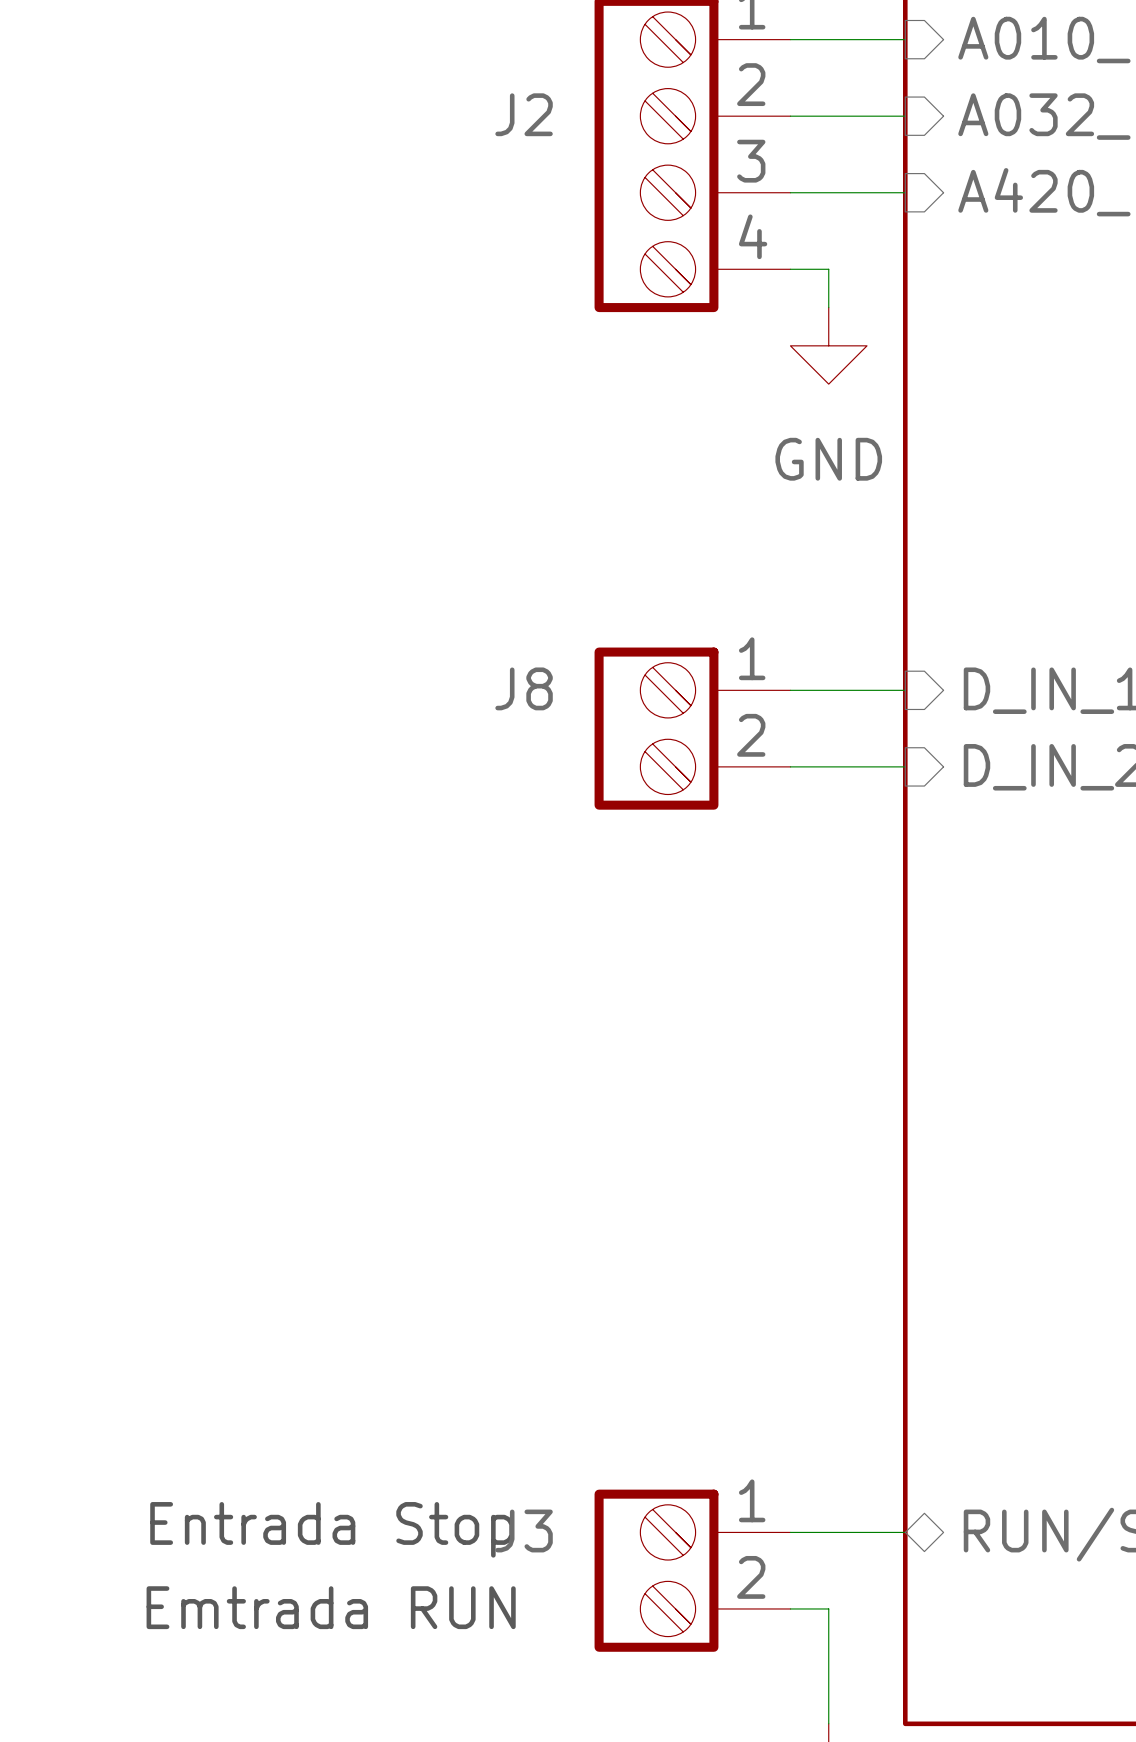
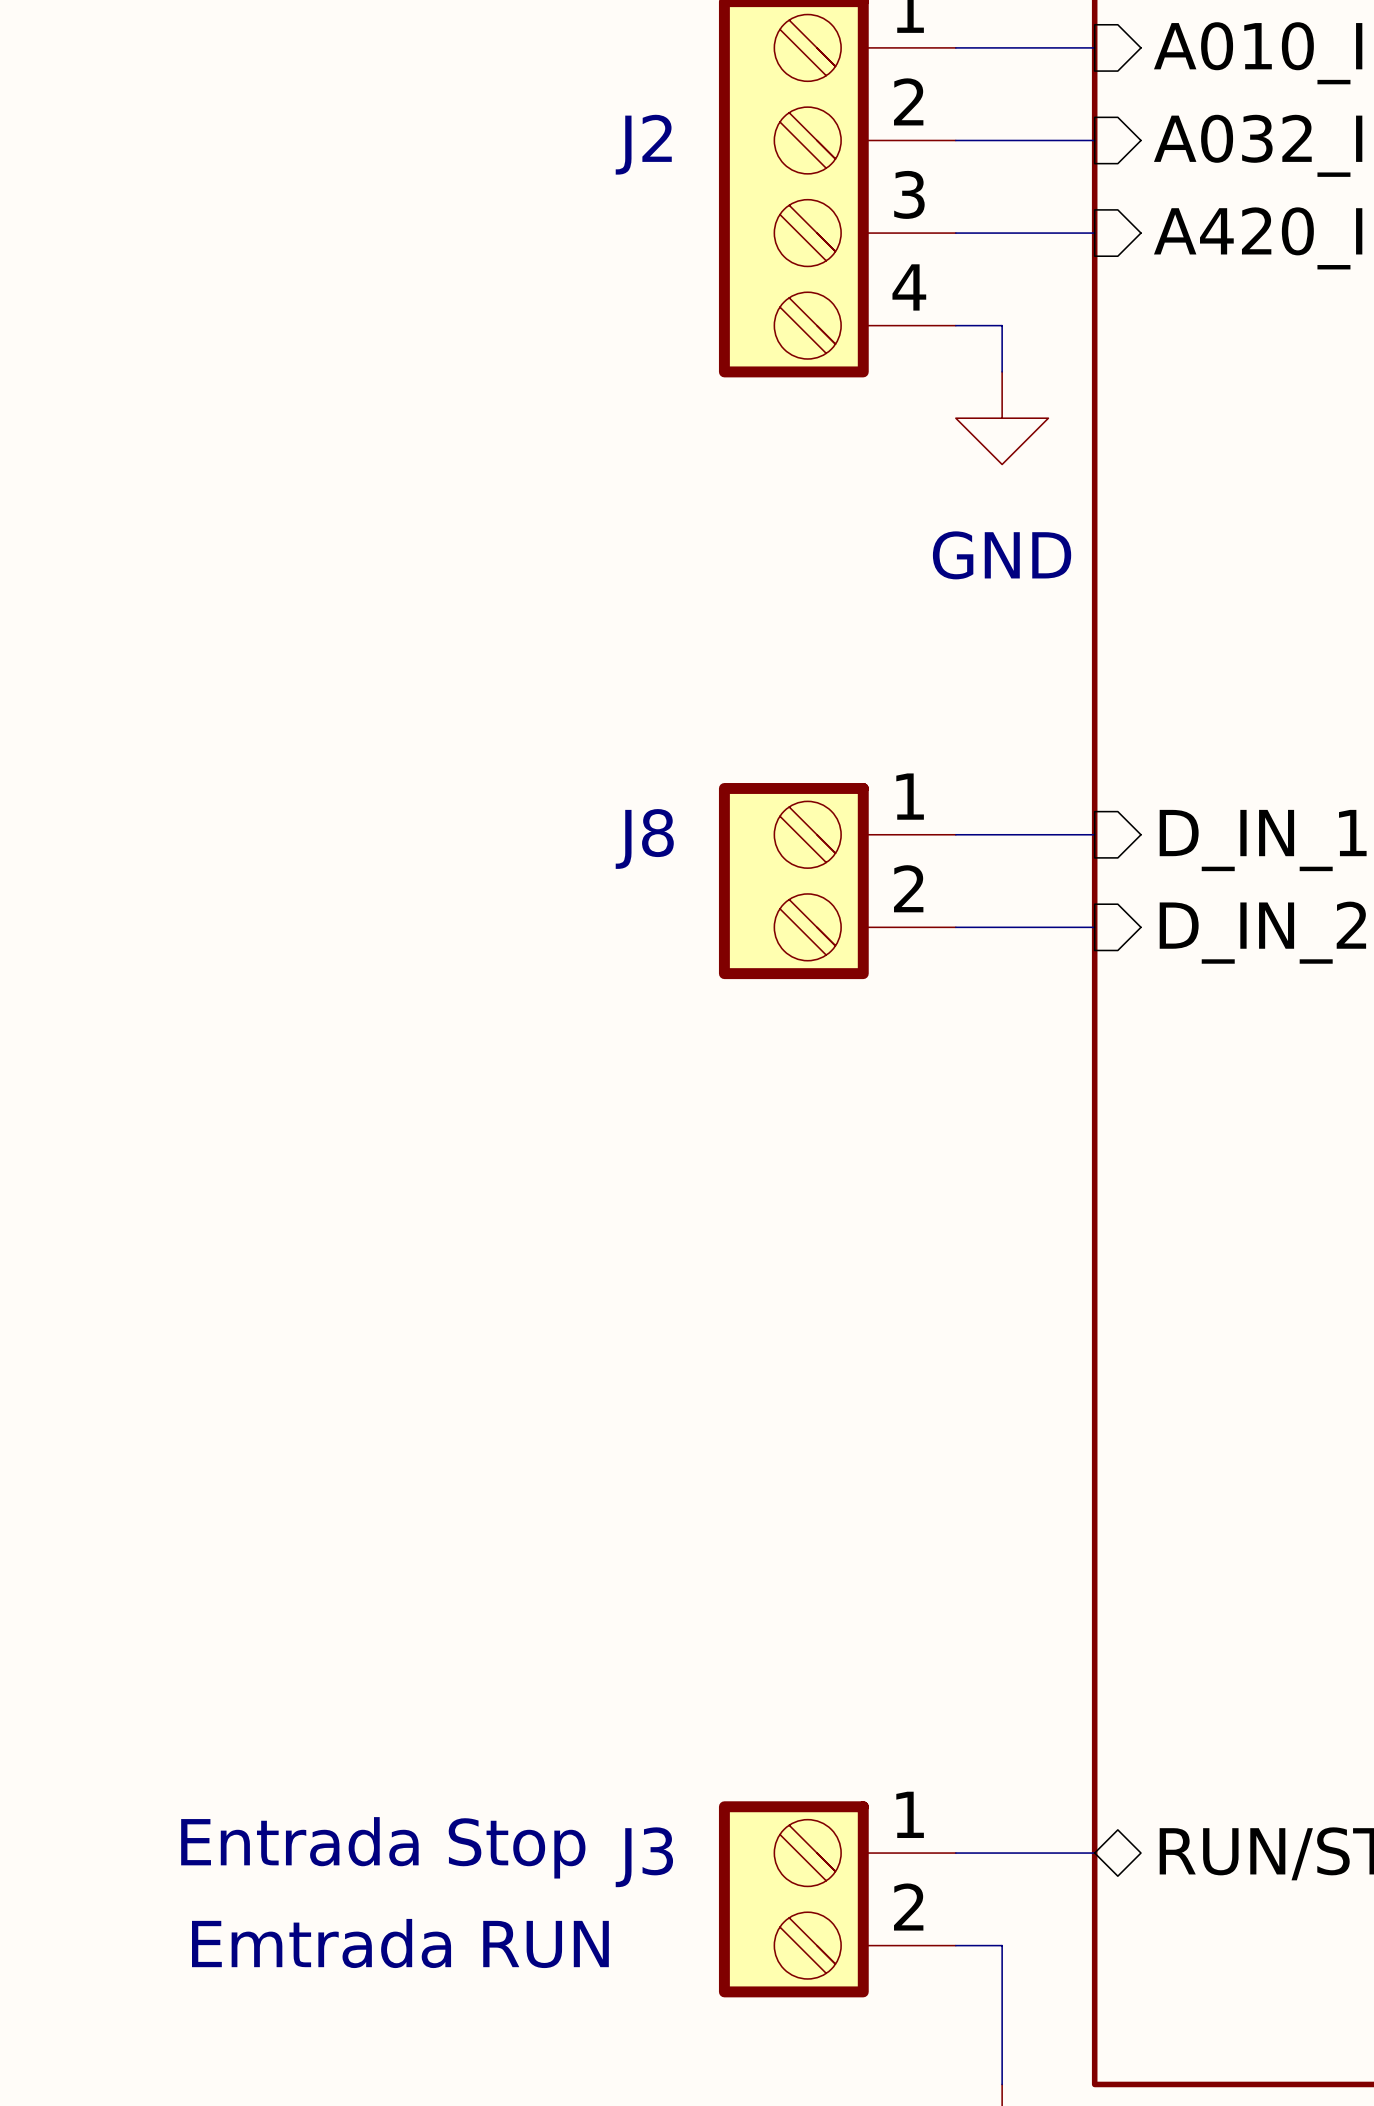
text position: Entrada Stop (332, 1529) -> Entrada Stop (383, 1847)

